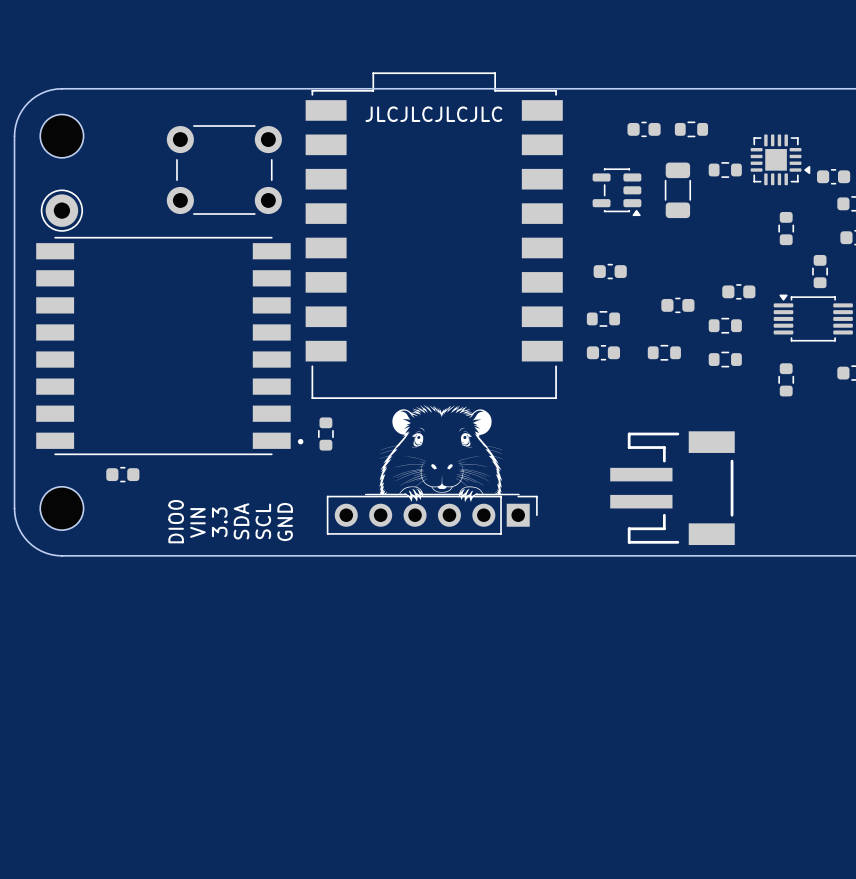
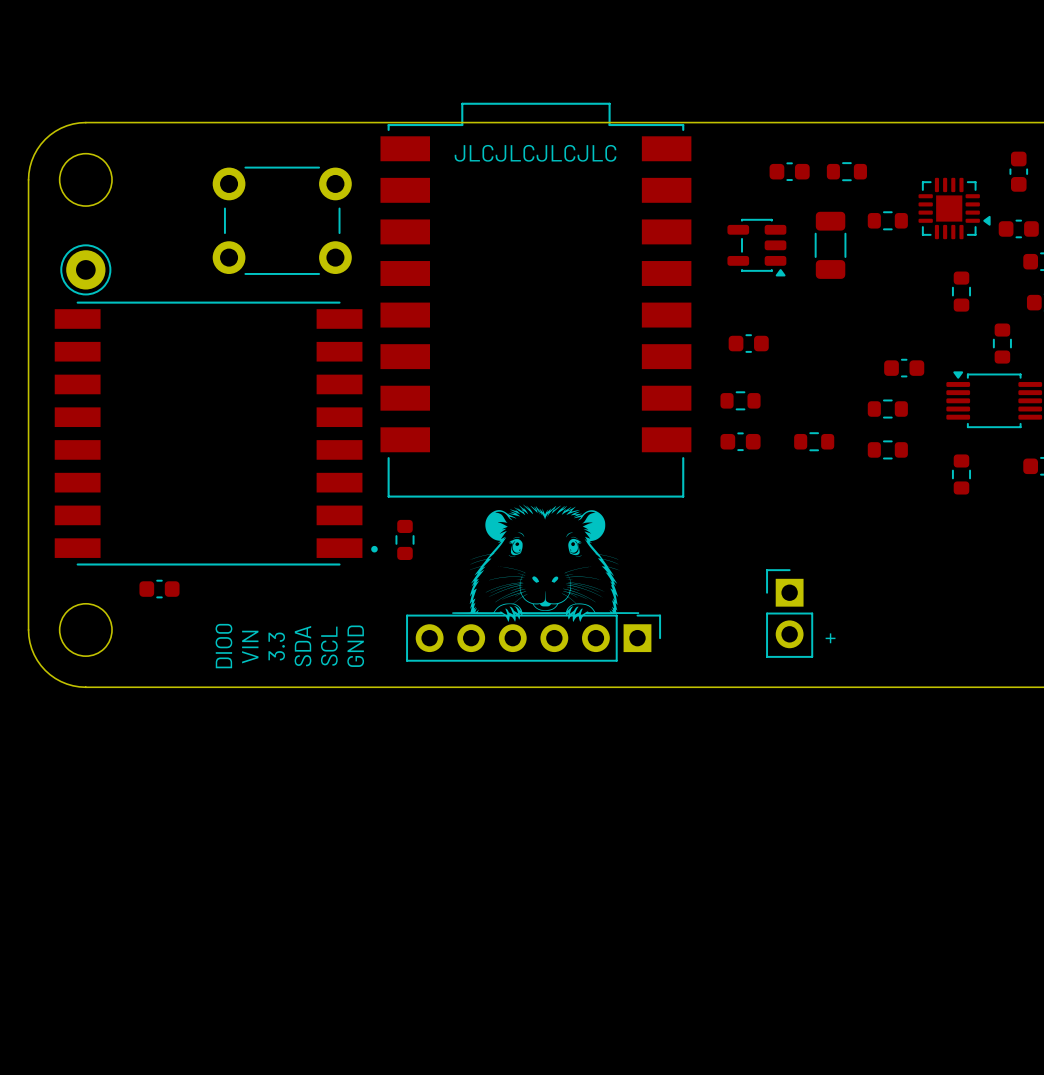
part rotation: 0° (677, 305) -> 90° clockwise (1018, 171)
part position: (677, 305) -> (1018, 171)
part: (672, 488) -> none
part: none -> (789, 613)

